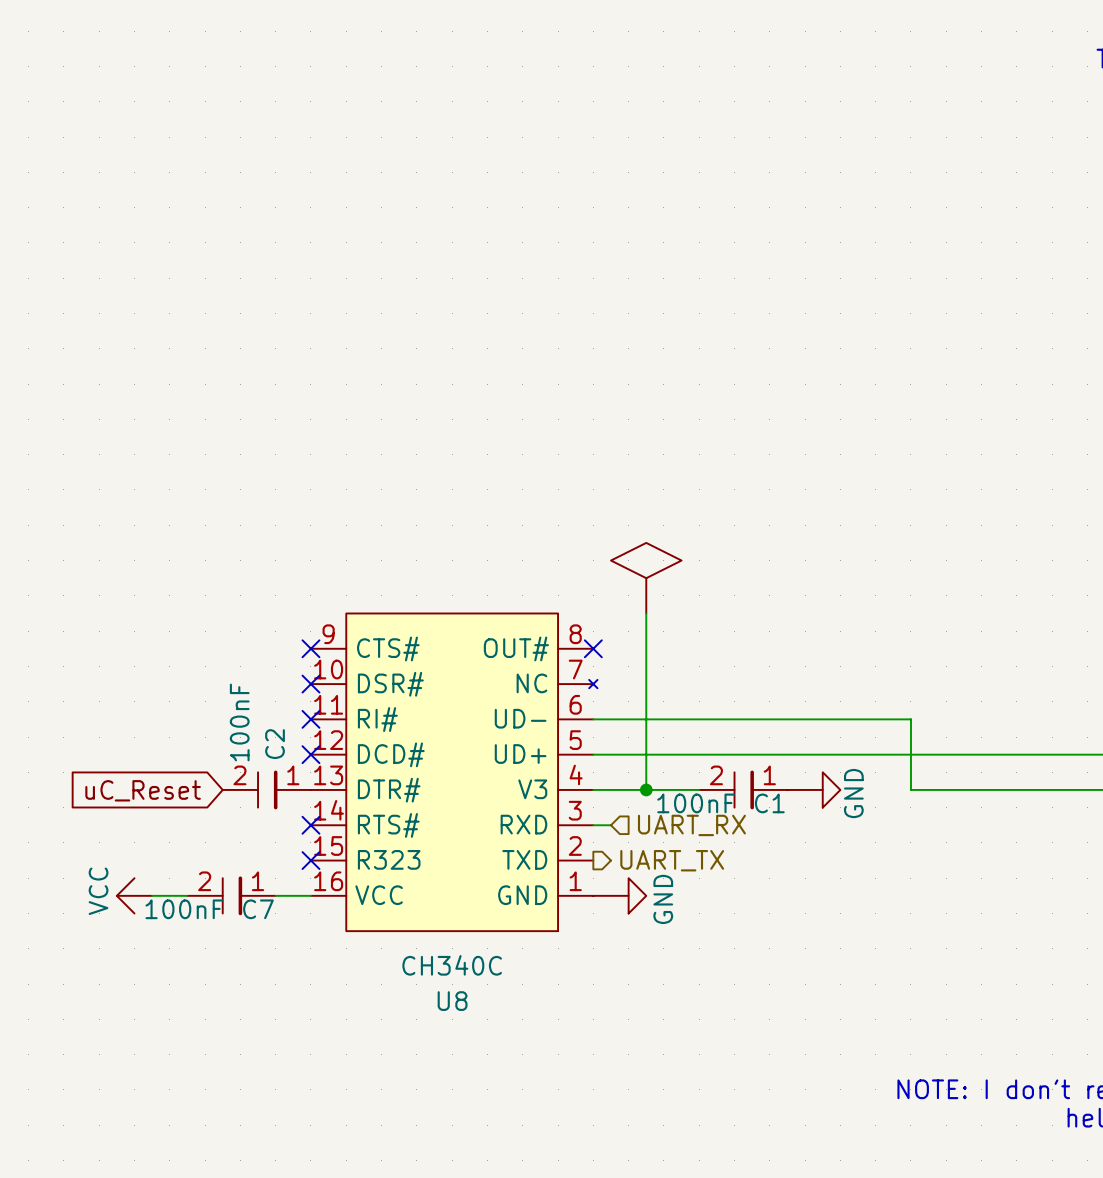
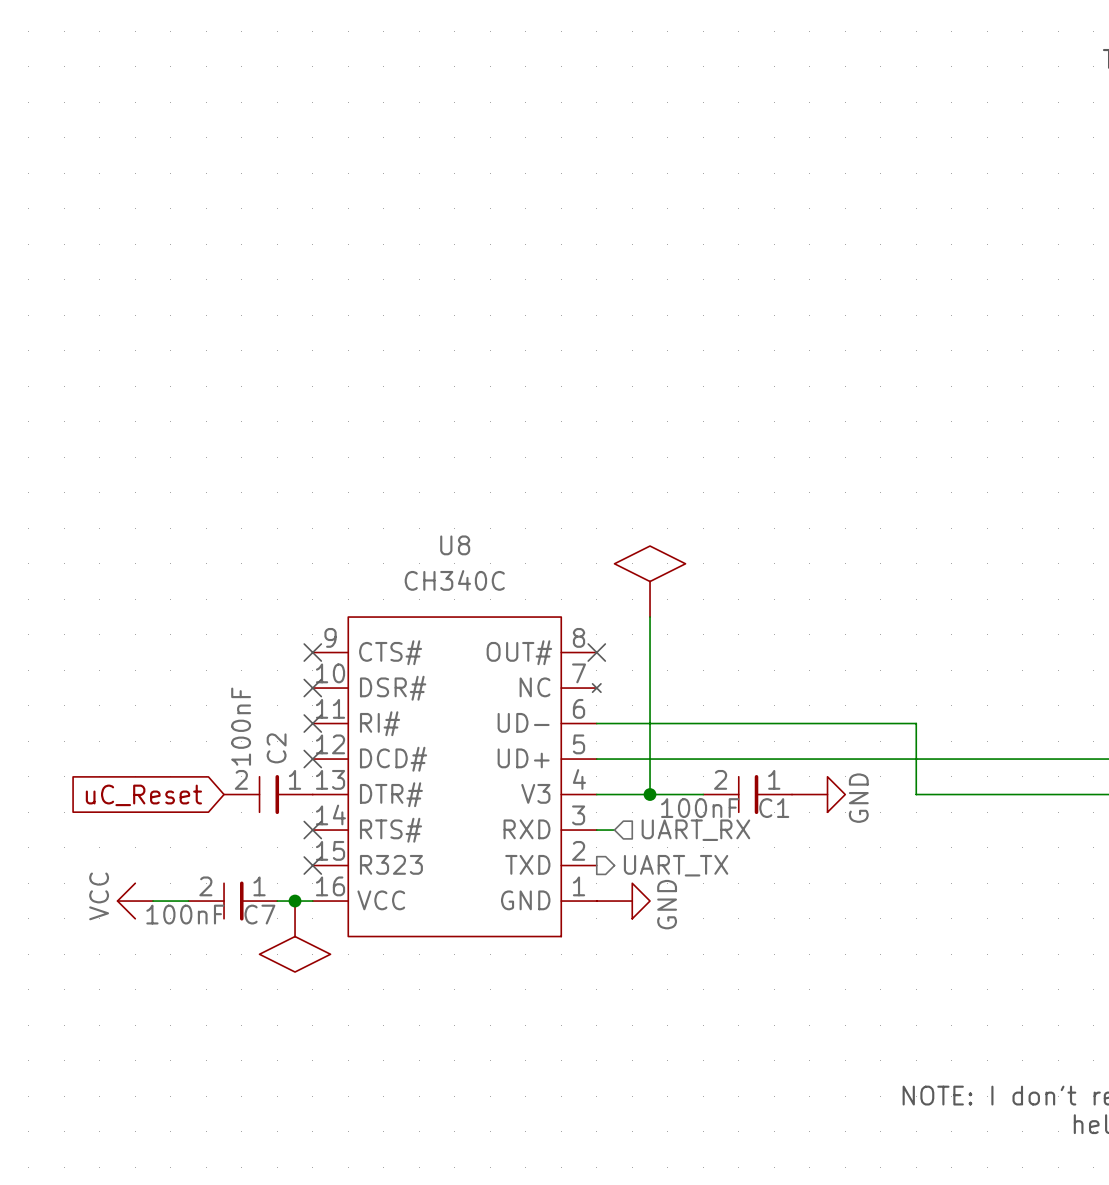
junction: none -> (295, 901)
power symbol: none -> (295, 936)
U8 value position: CH340C (452, 965) -> CH340C (454, 580)
U8 name position: U8 (452, 1001) -> U8 (455, 545)

